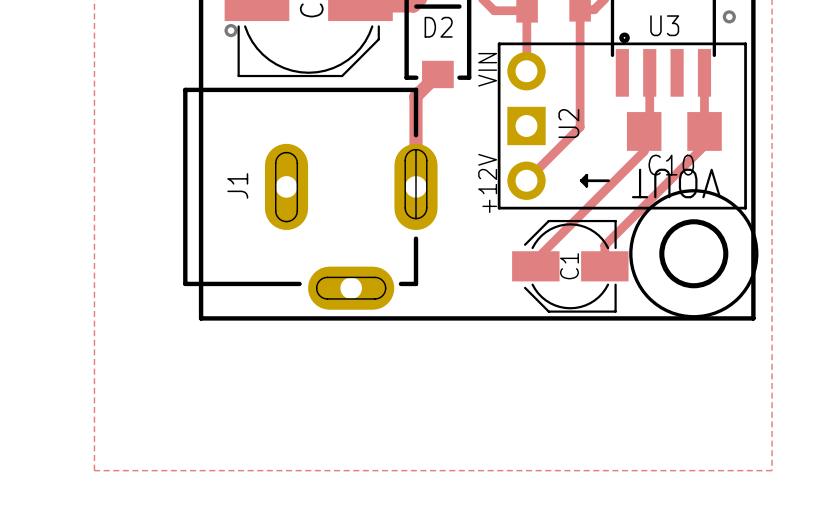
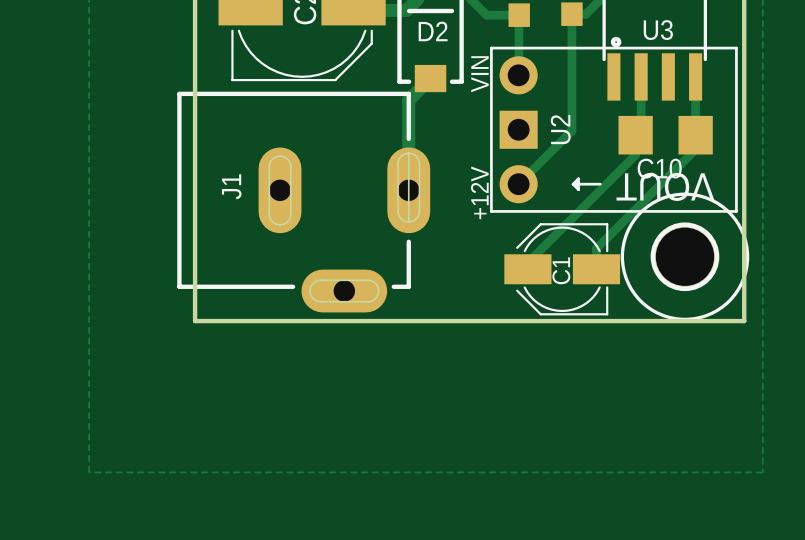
via: (729, 16) -> none
via: (231, 30) -> none

